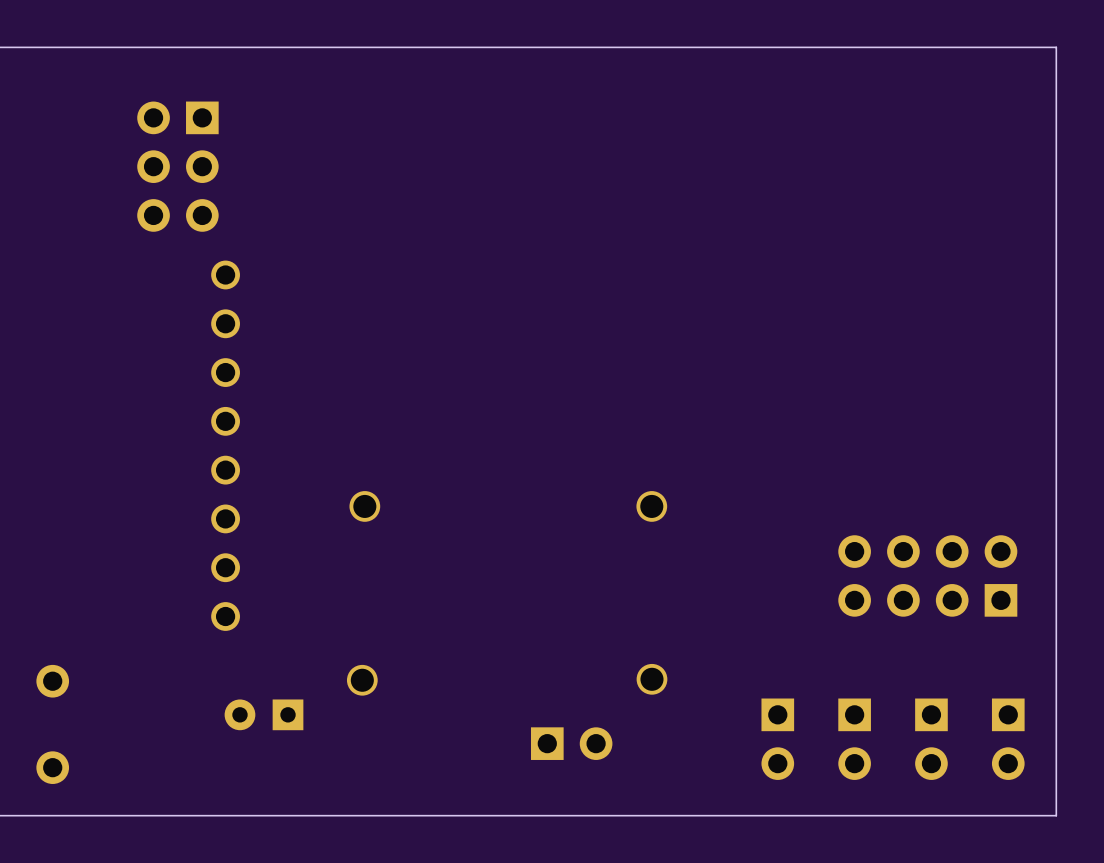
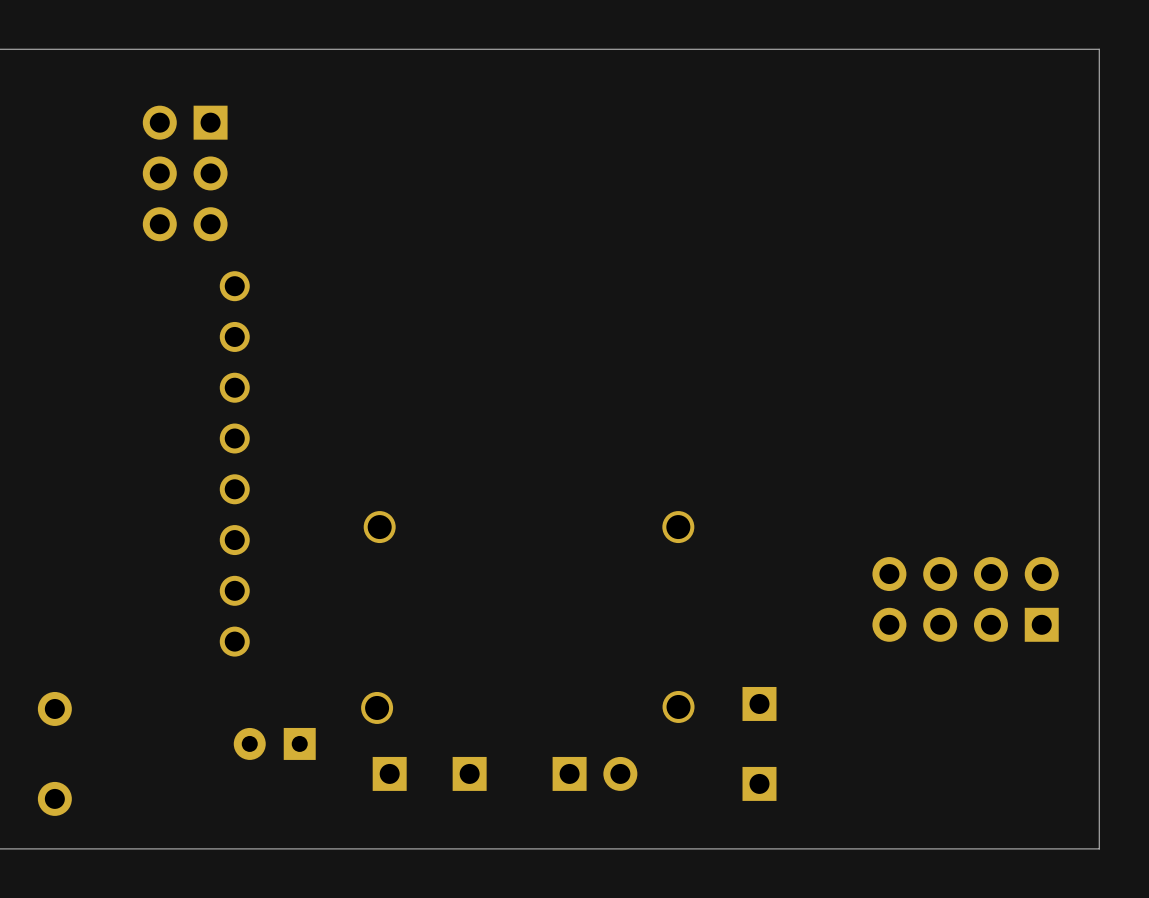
part: none -> (759, 703)
part: (777, 739) -> none
part: (854, 739) -> none
part: (931, 739) -> none
part: (1008, 739) -> none
part: none -> (389, 773)
part: none -> (469, 773)
part: none -> (759, 783)

